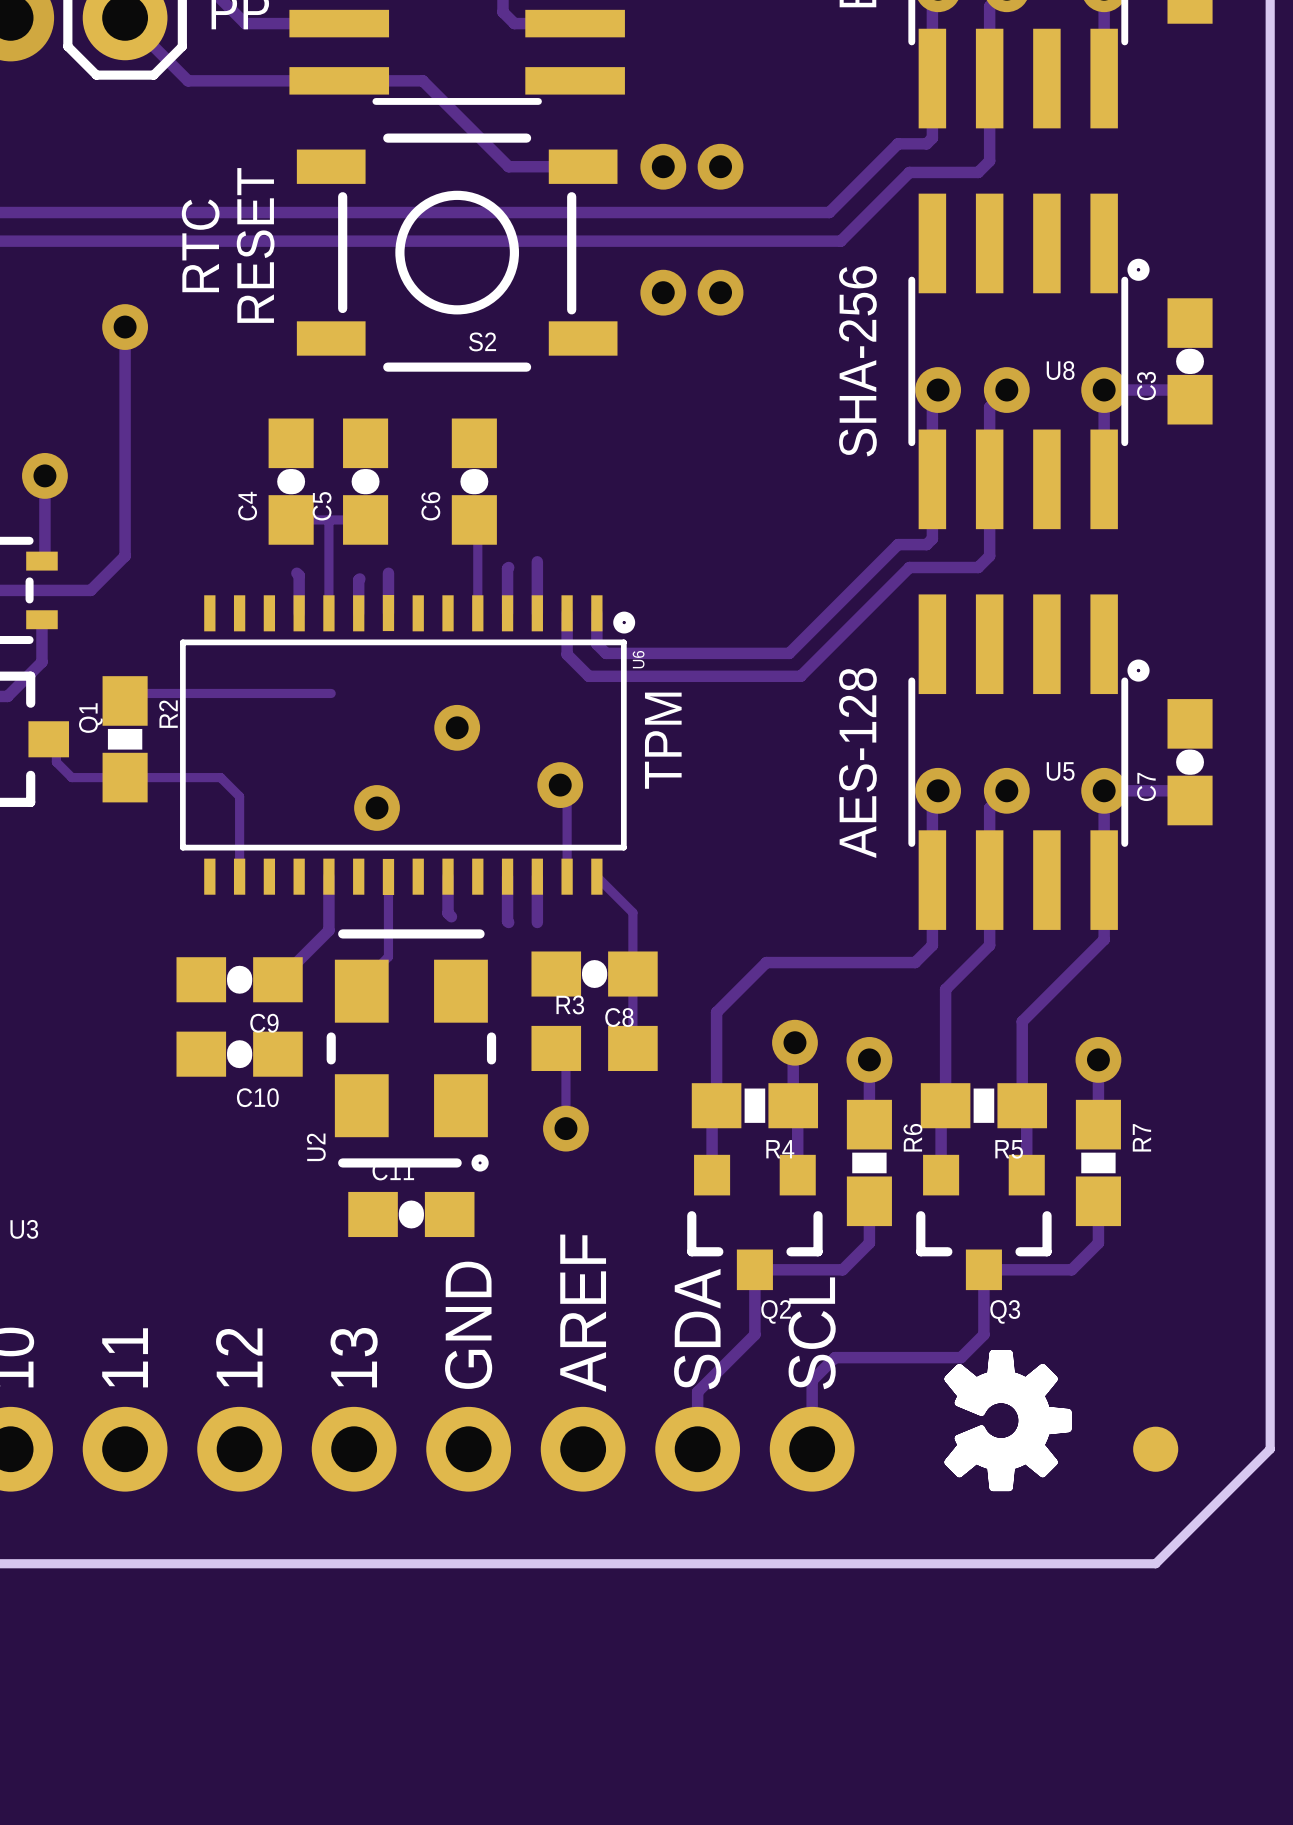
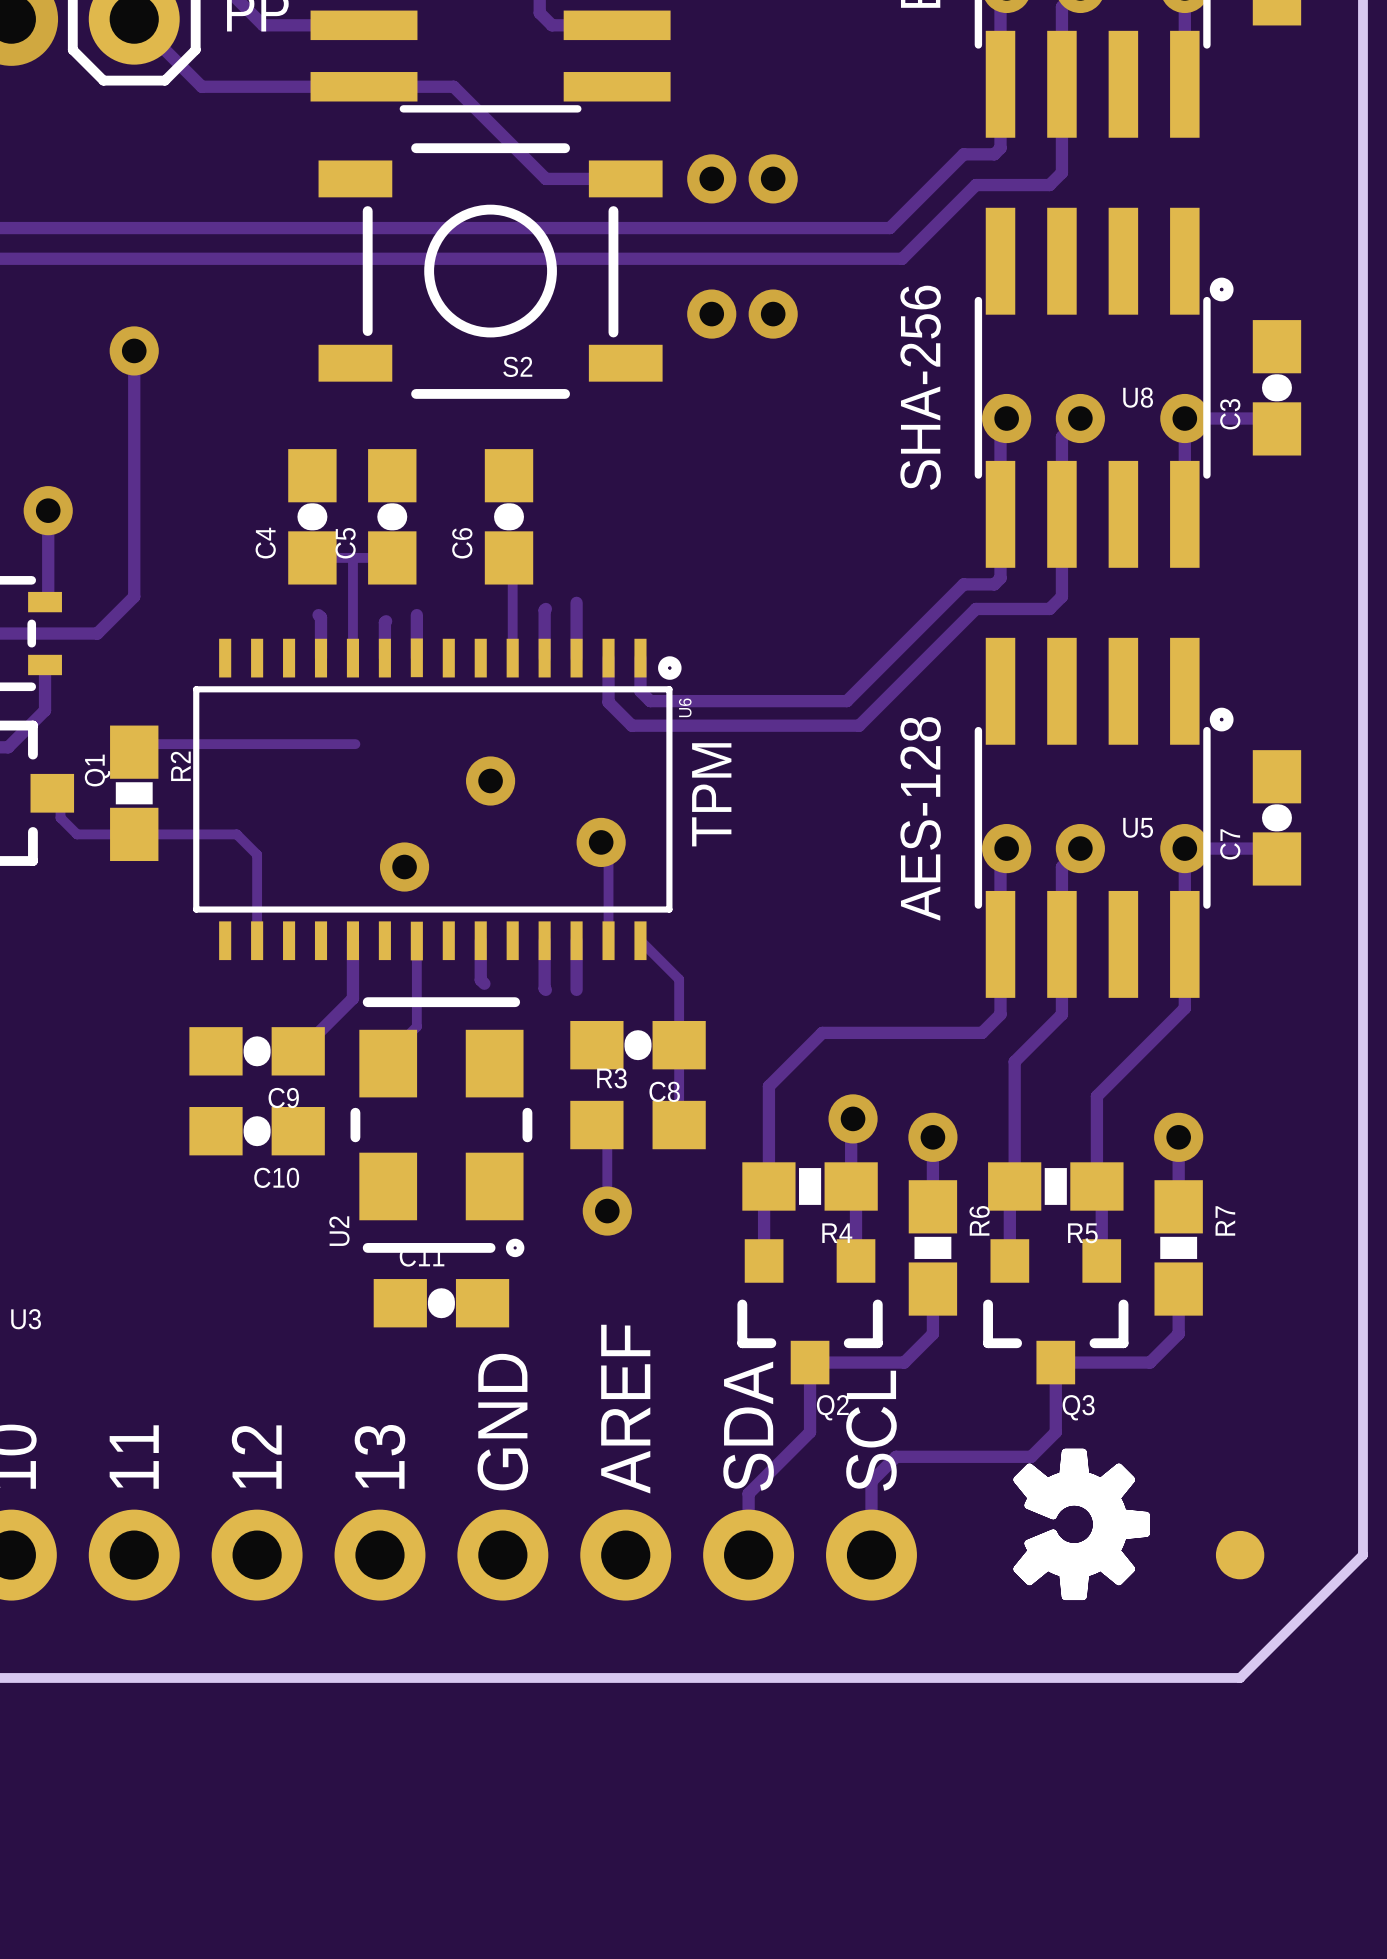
text: RTC (200, 245) -> none
text: RESET (255, 245) -> none

